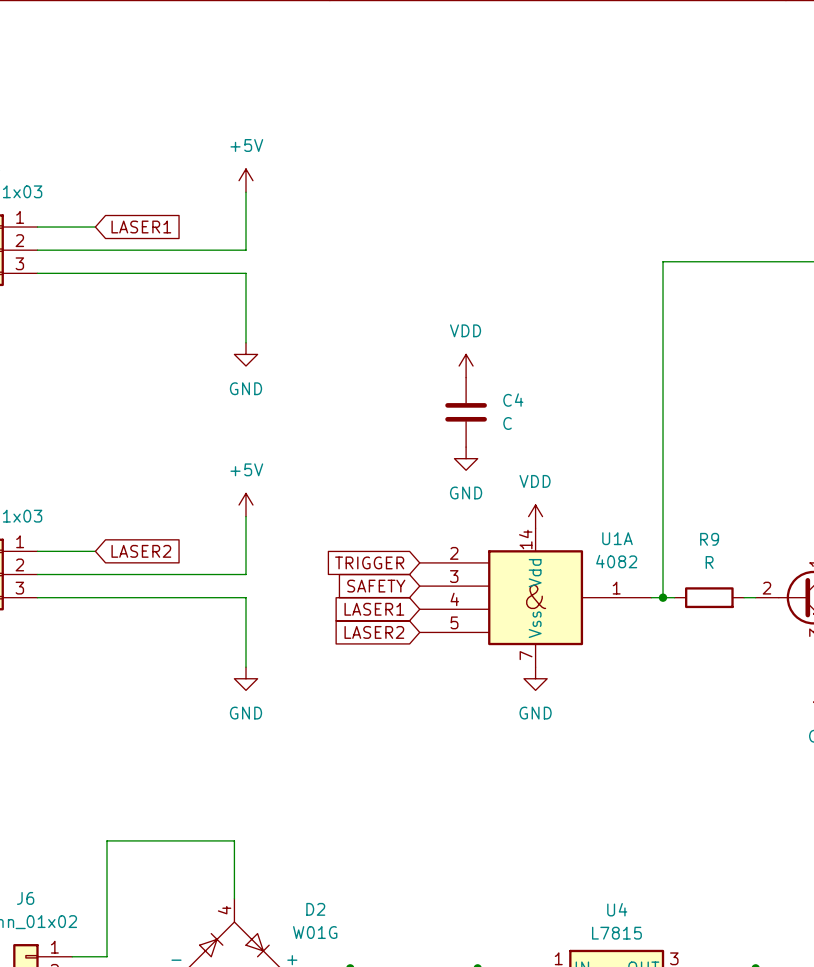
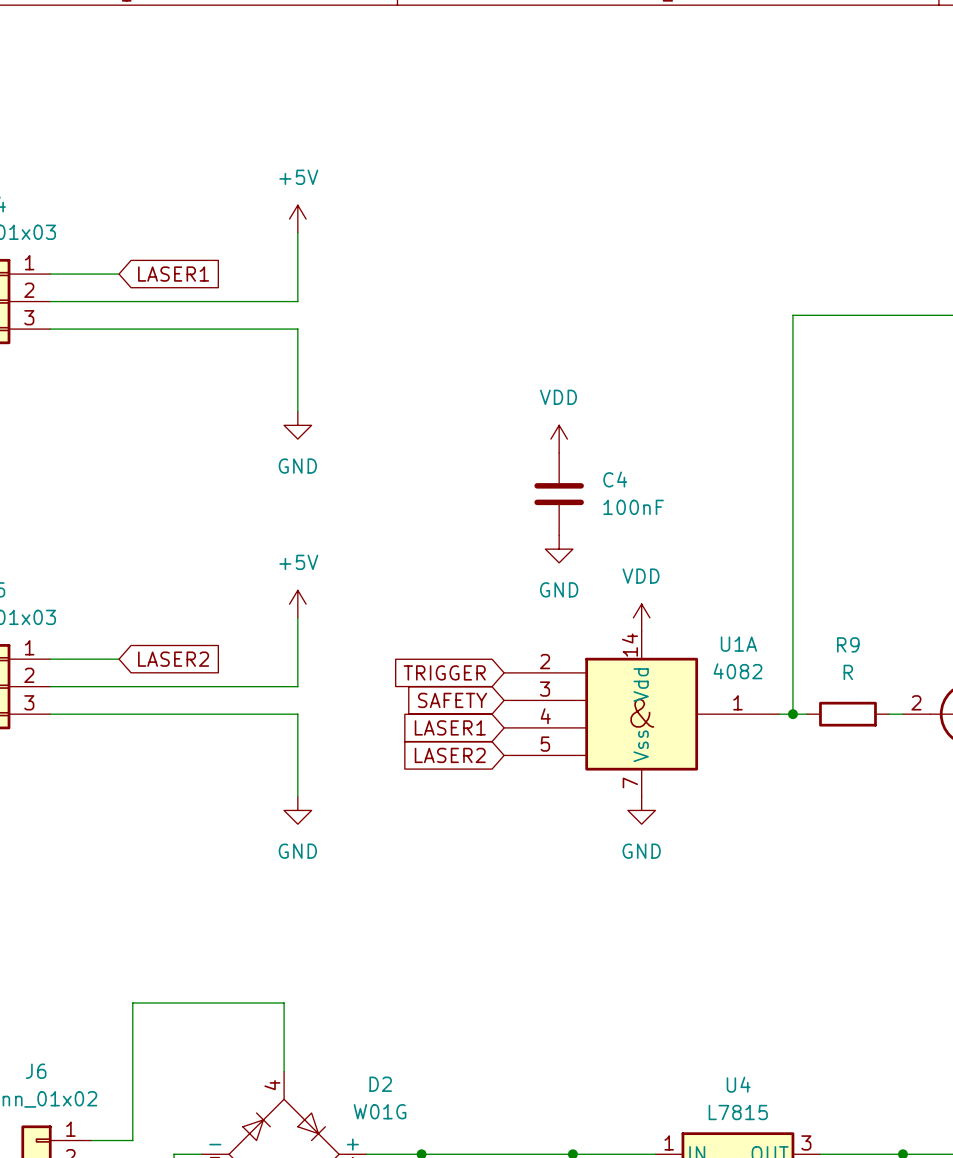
C4 value: C (507, 423) -> 100nF (633, 507)

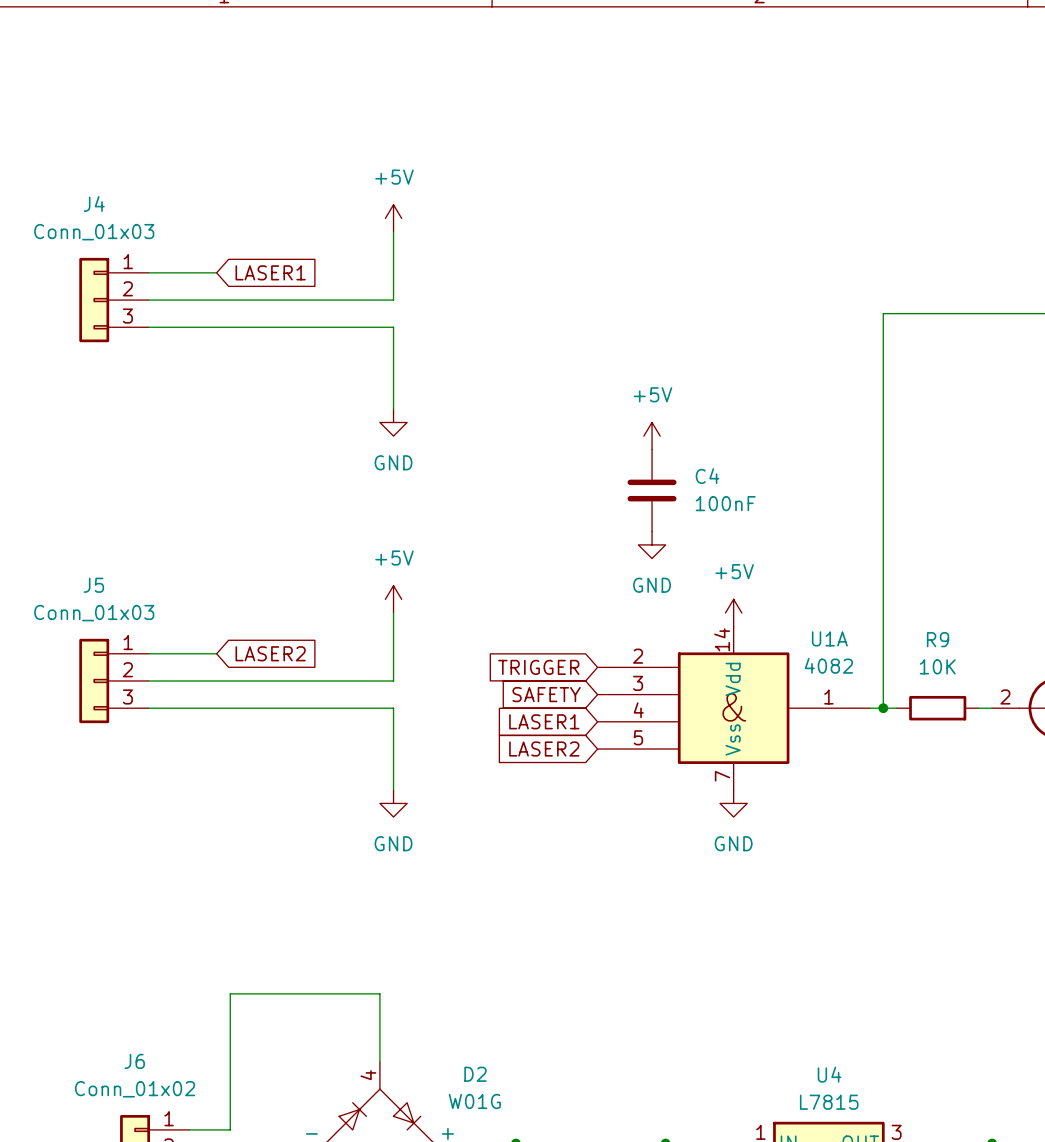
power symbol: VDD (559, 439) -> +5V (652, 436)
power symbol: VDD (641, 617) -> +5V (733, 612)
R9 value: R (848, 672) -> 10K (937, 666)

